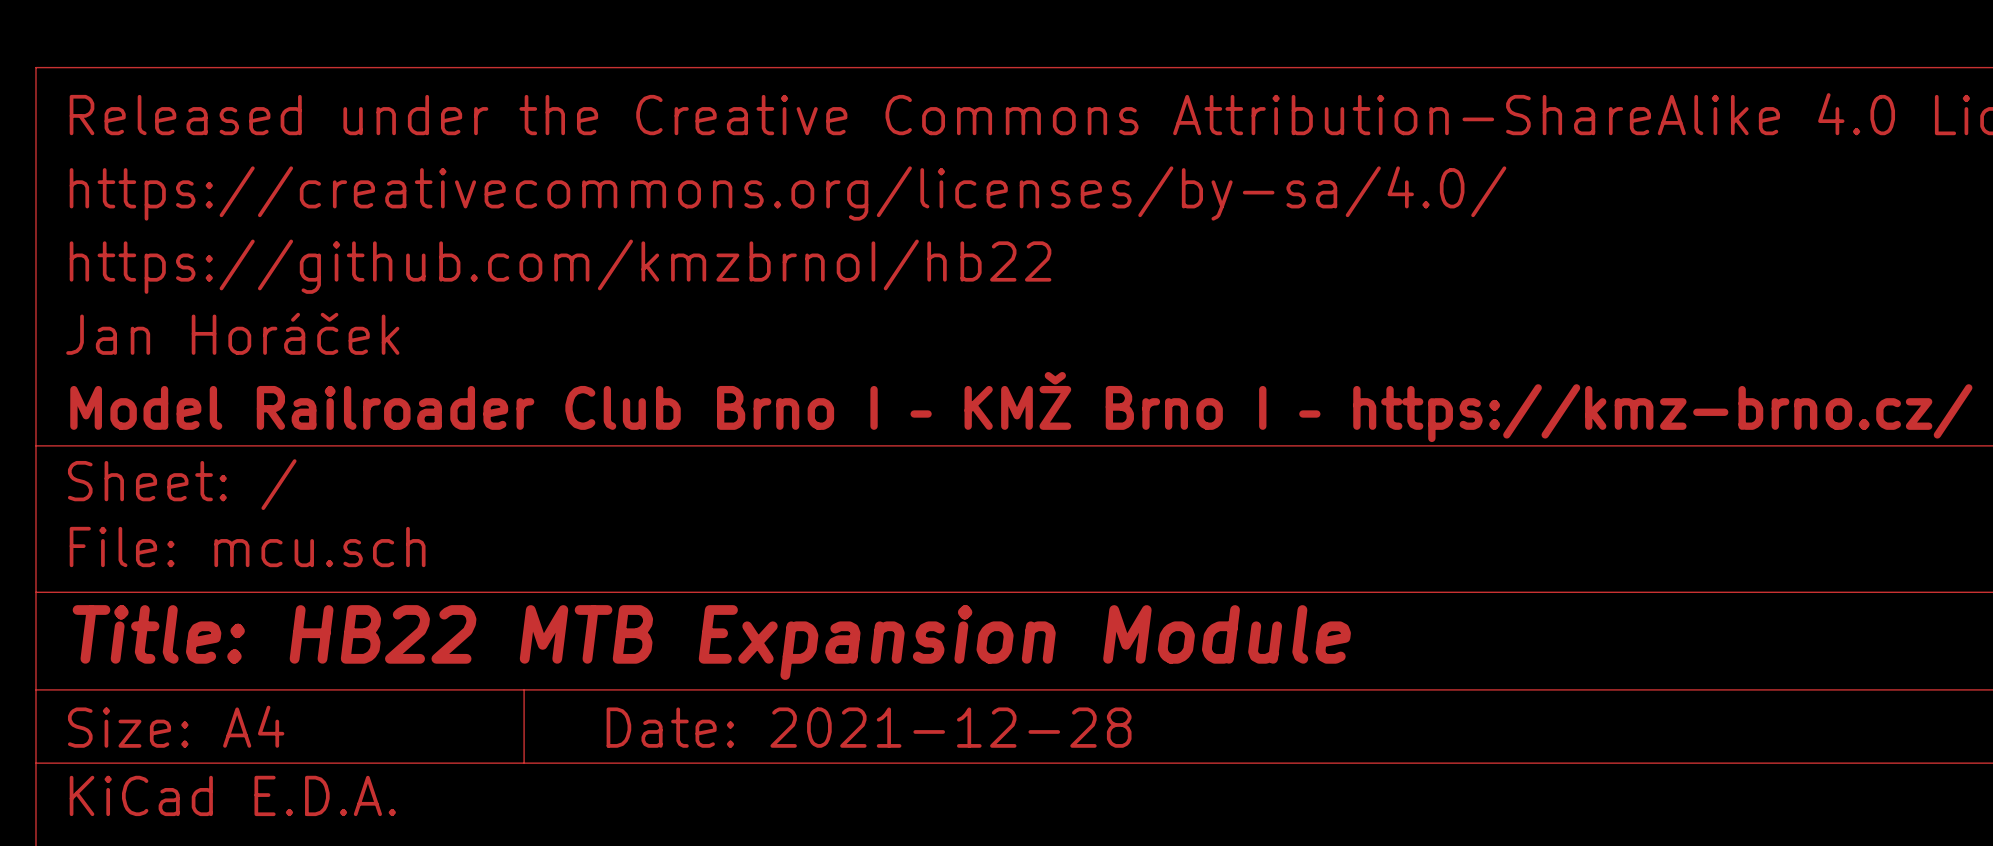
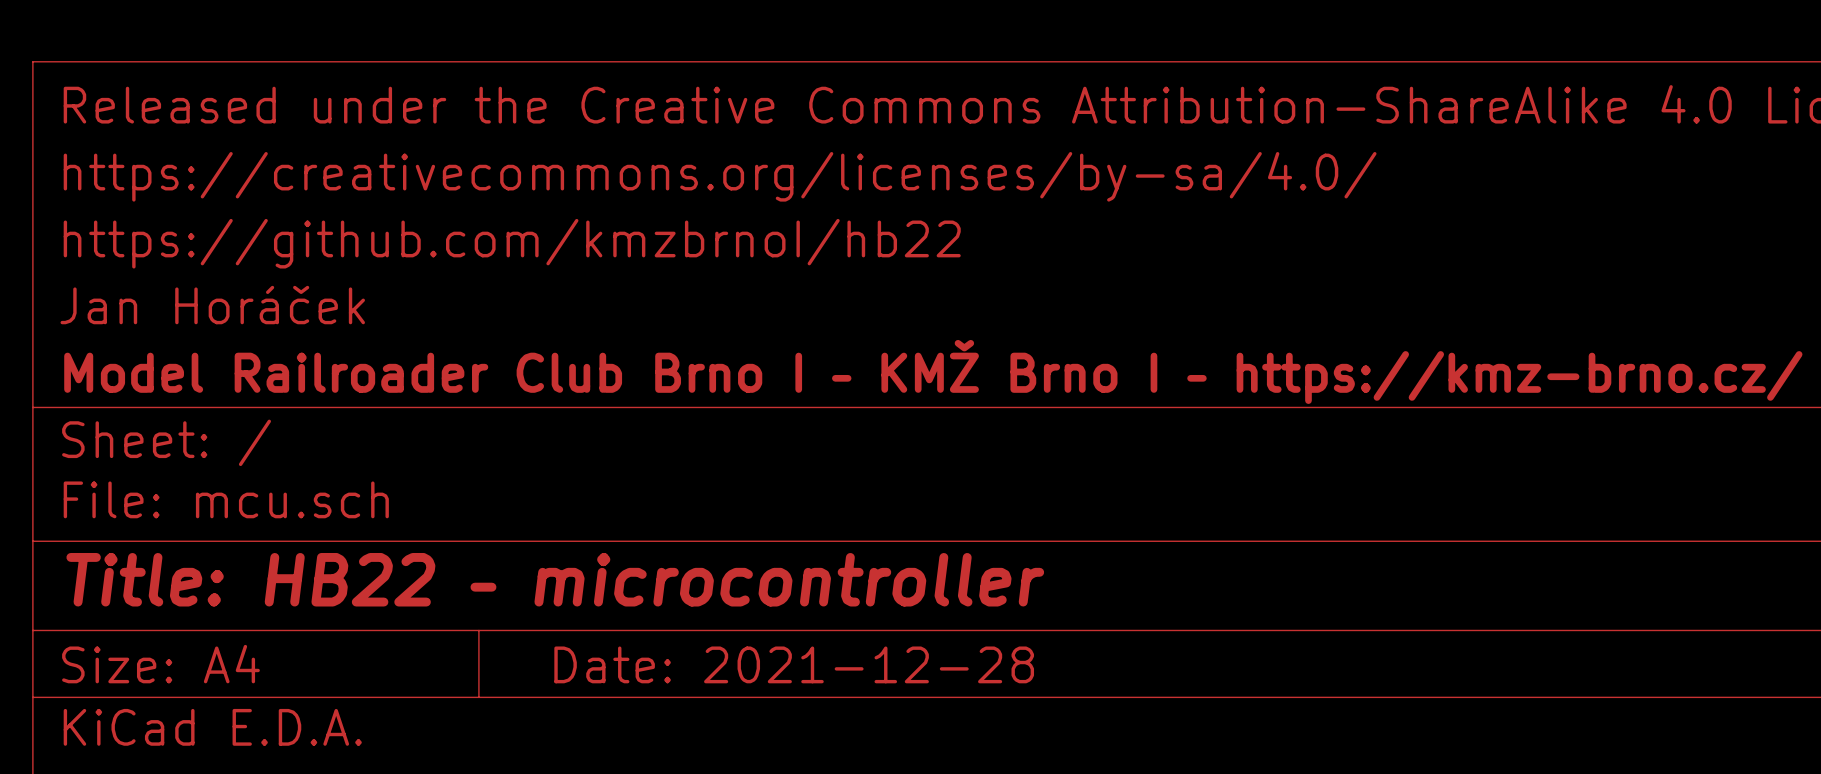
title block: Title: HB22 MTB Expansion Module (711, 642) -> Title: HB22 – microcontroller (555, 579)

